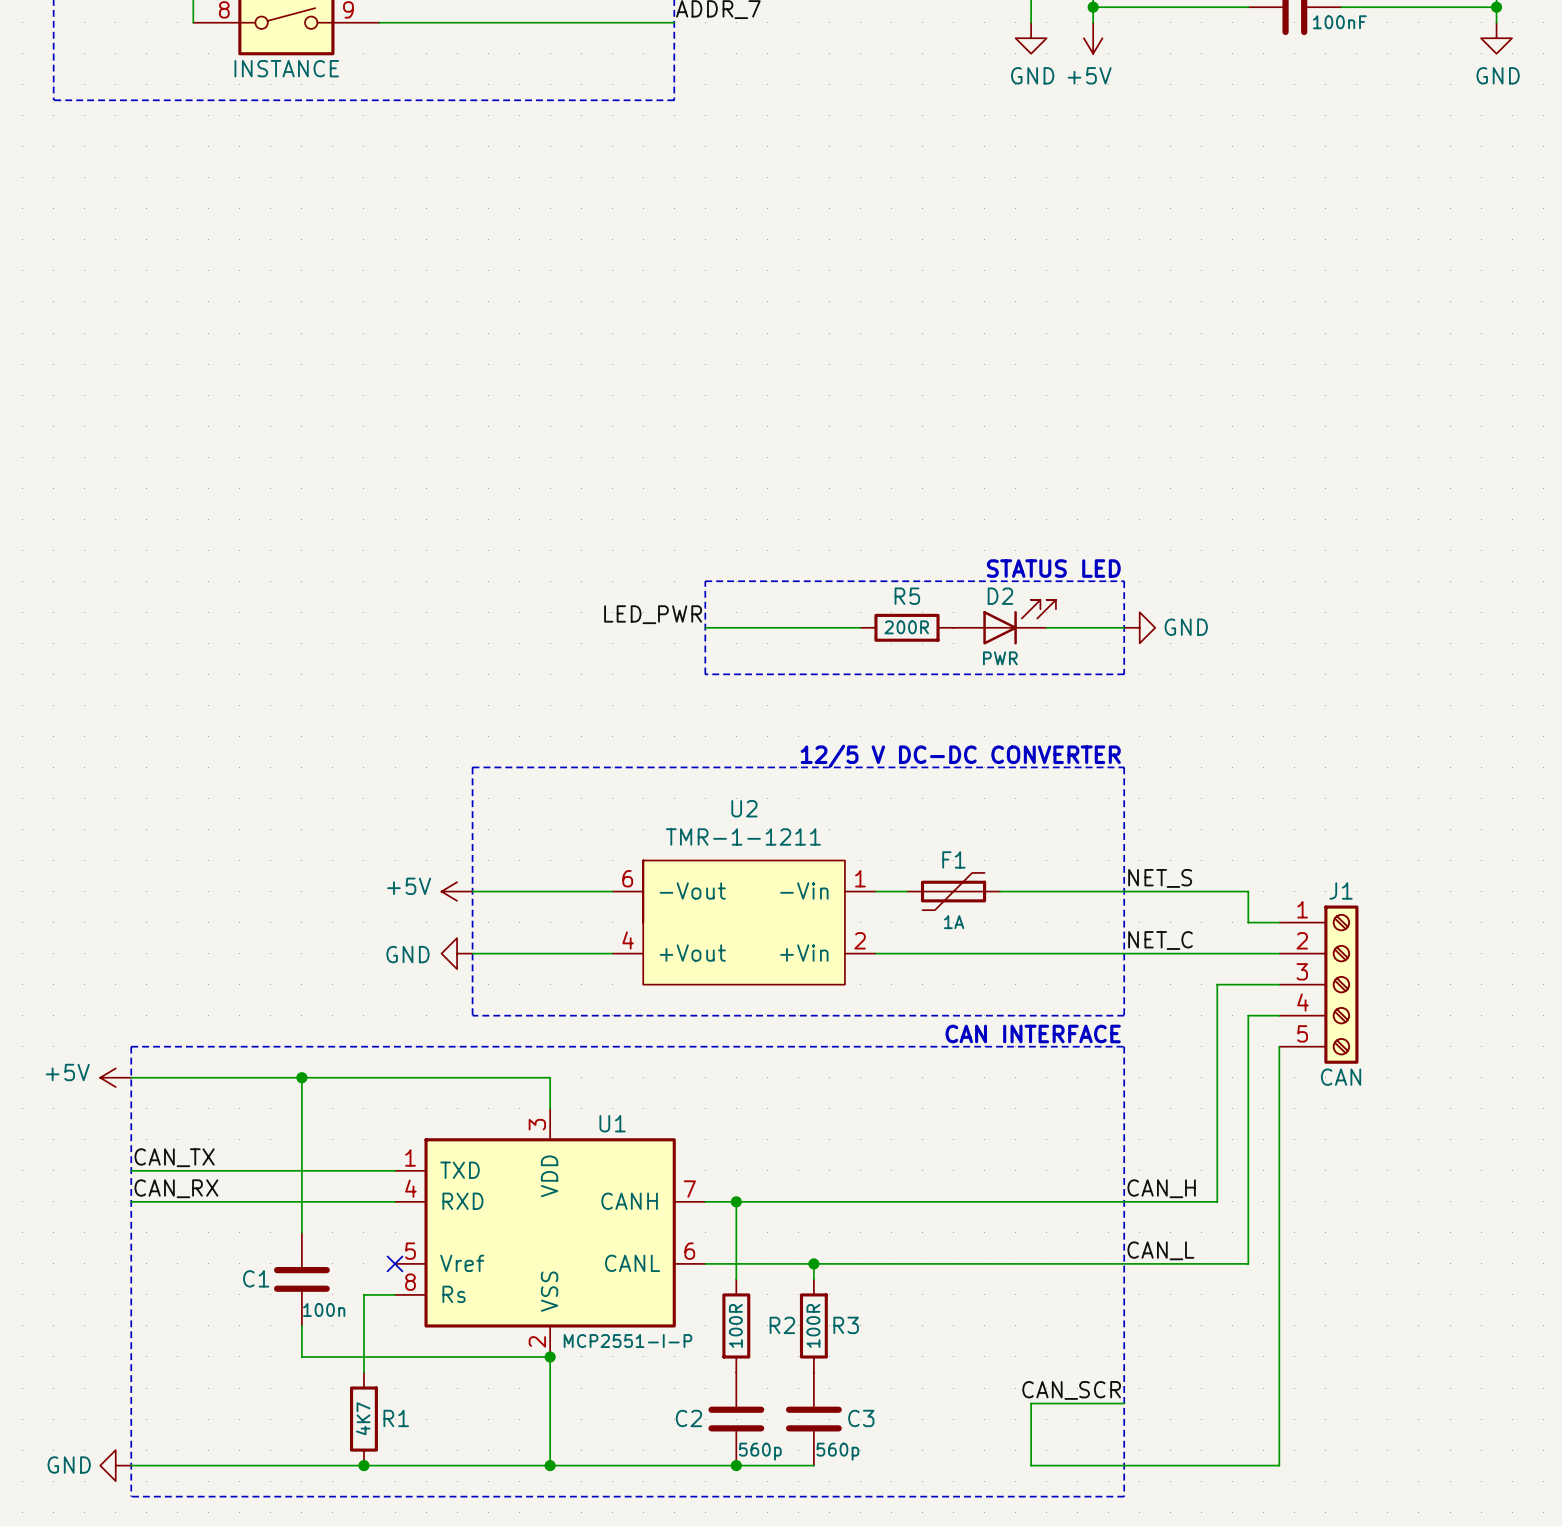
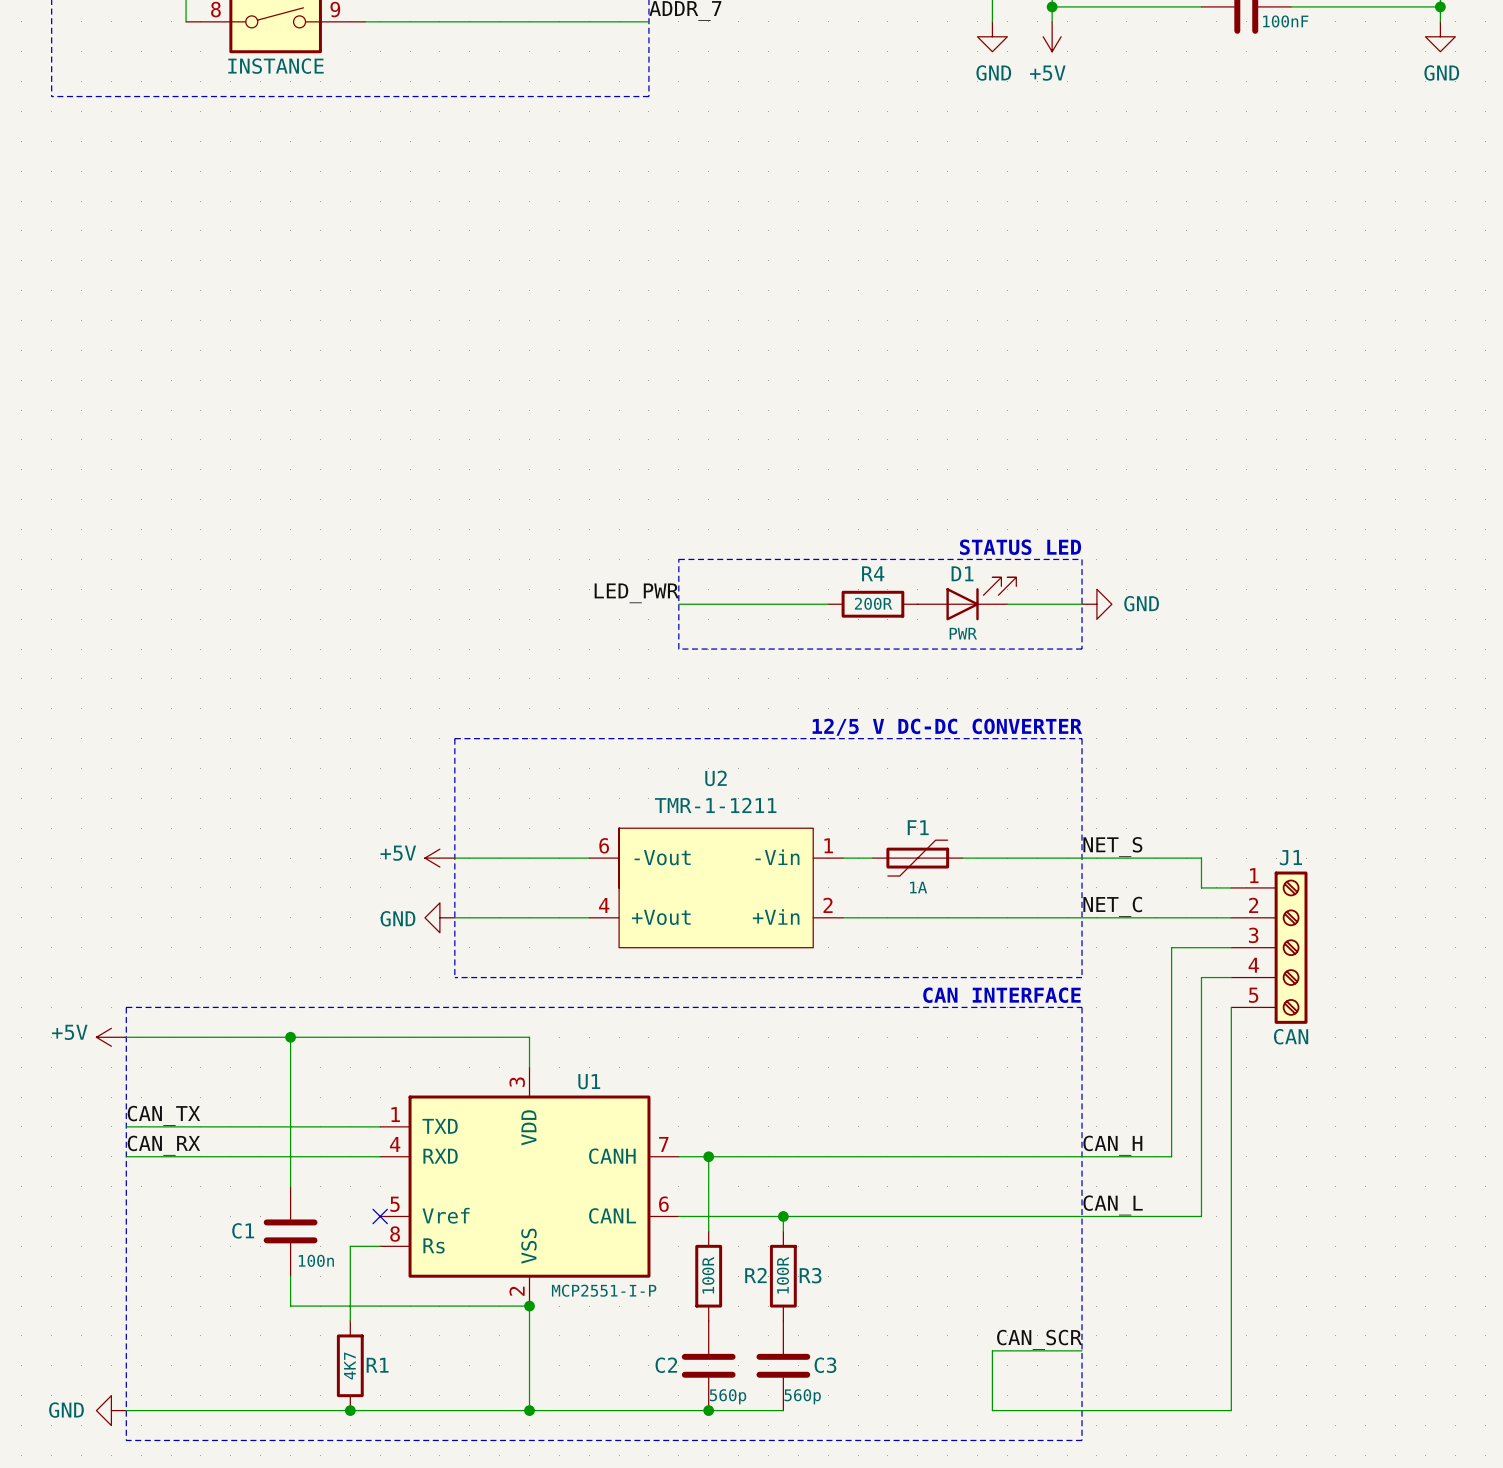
R5 name: R5 (907, 596) -> R4 (873, 573)
D2 name: D2 (1000, 596) -> D1 (962, 573)

